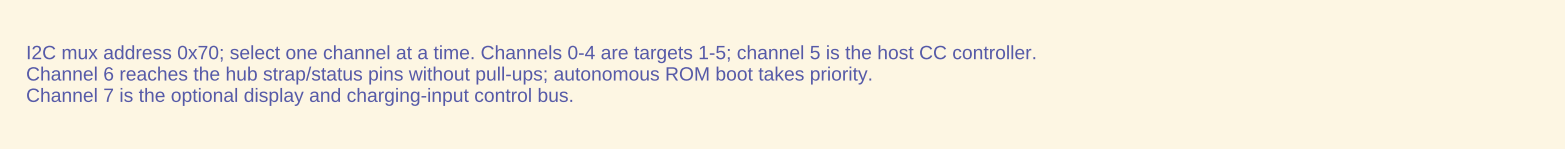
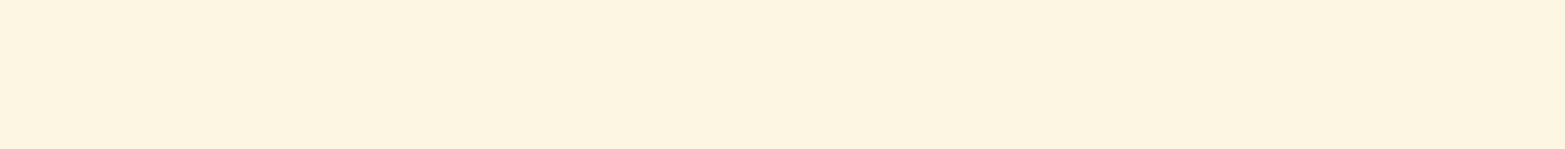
text: I2C mux address 0x70; select one channel at a time. Channels 0-4 are targets 1-5; channel 5 is the host CC controller. (531, 54) -> none
text: Channel 6 reaches the hub strap/status pins without pull-ups; autonomous ROM boot takes priority. (449, 75) -> none
text: Channel 7 is the optional display and charging-input control bus. (299, 96) -> none

